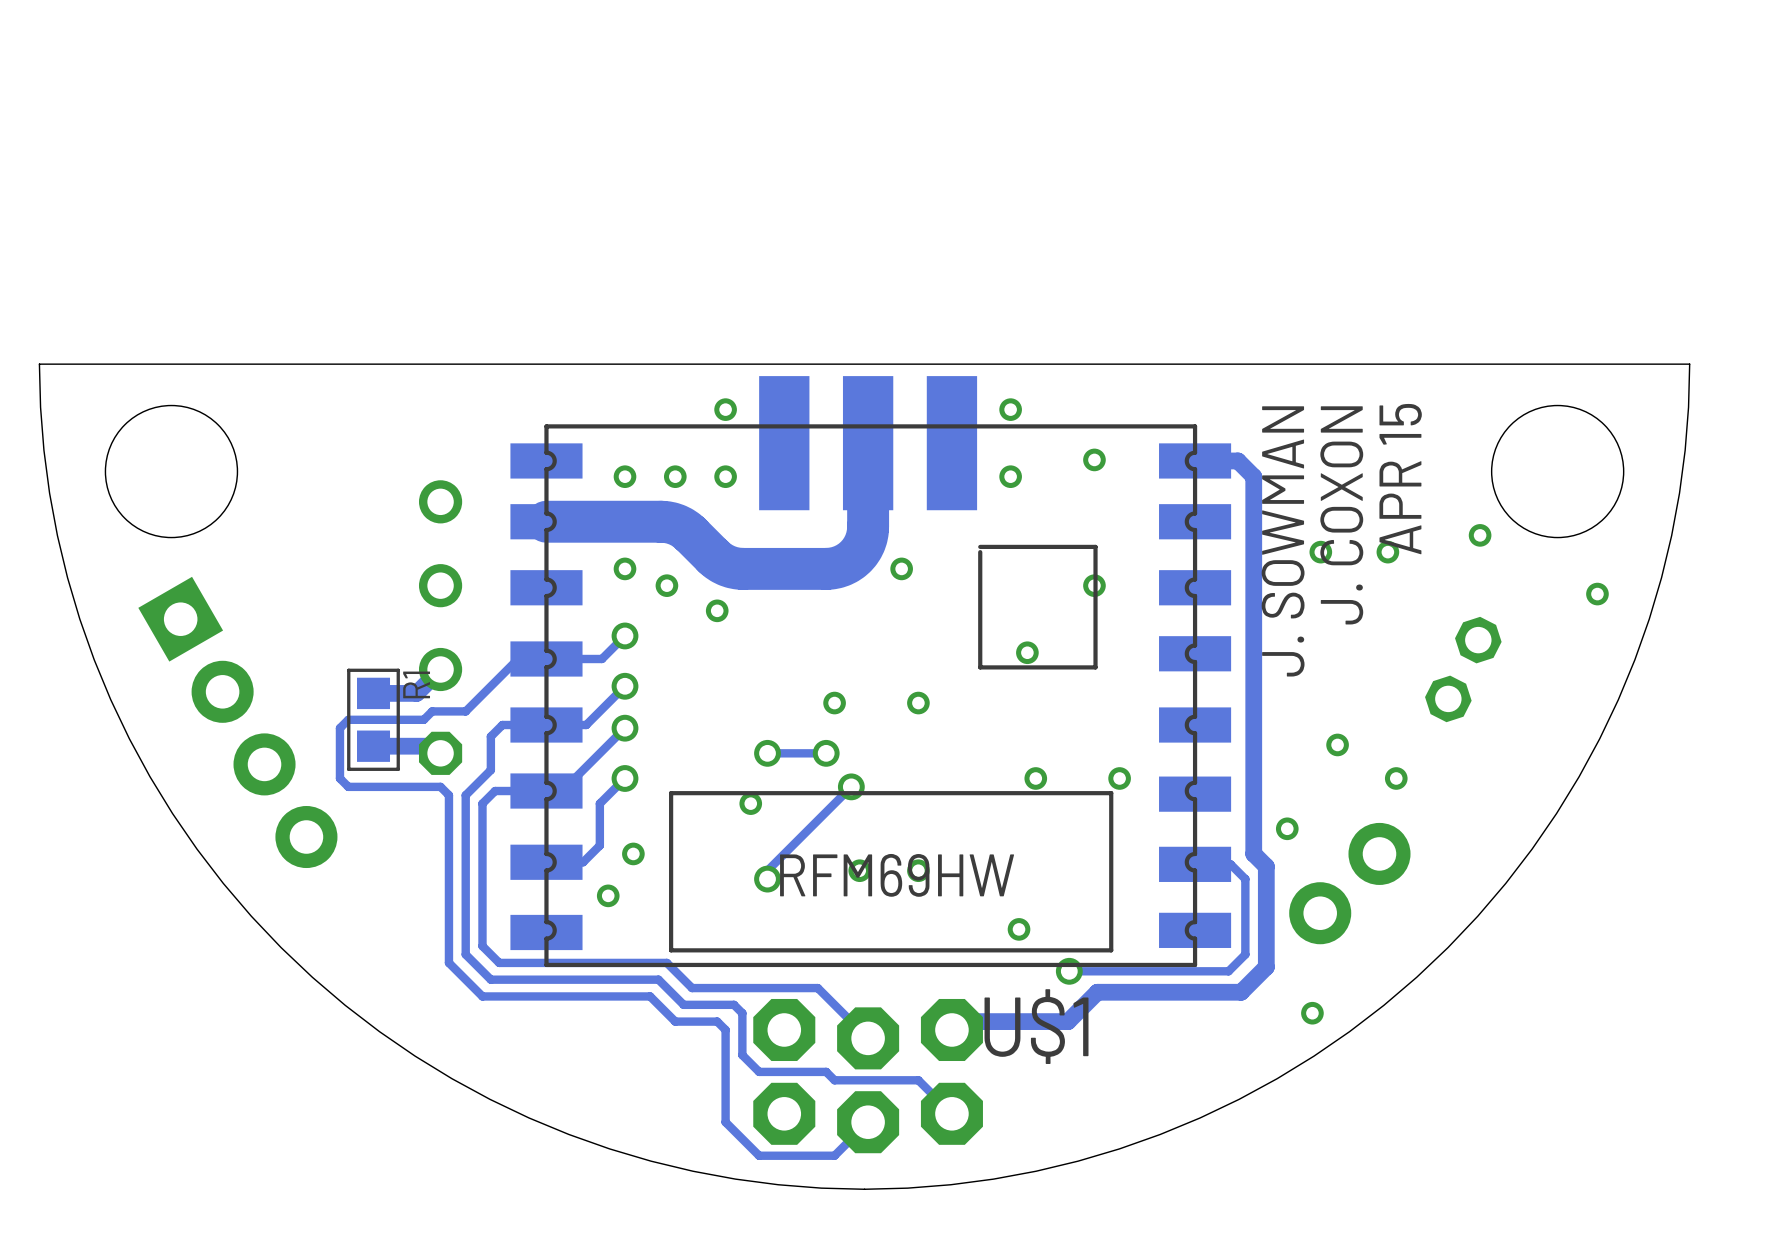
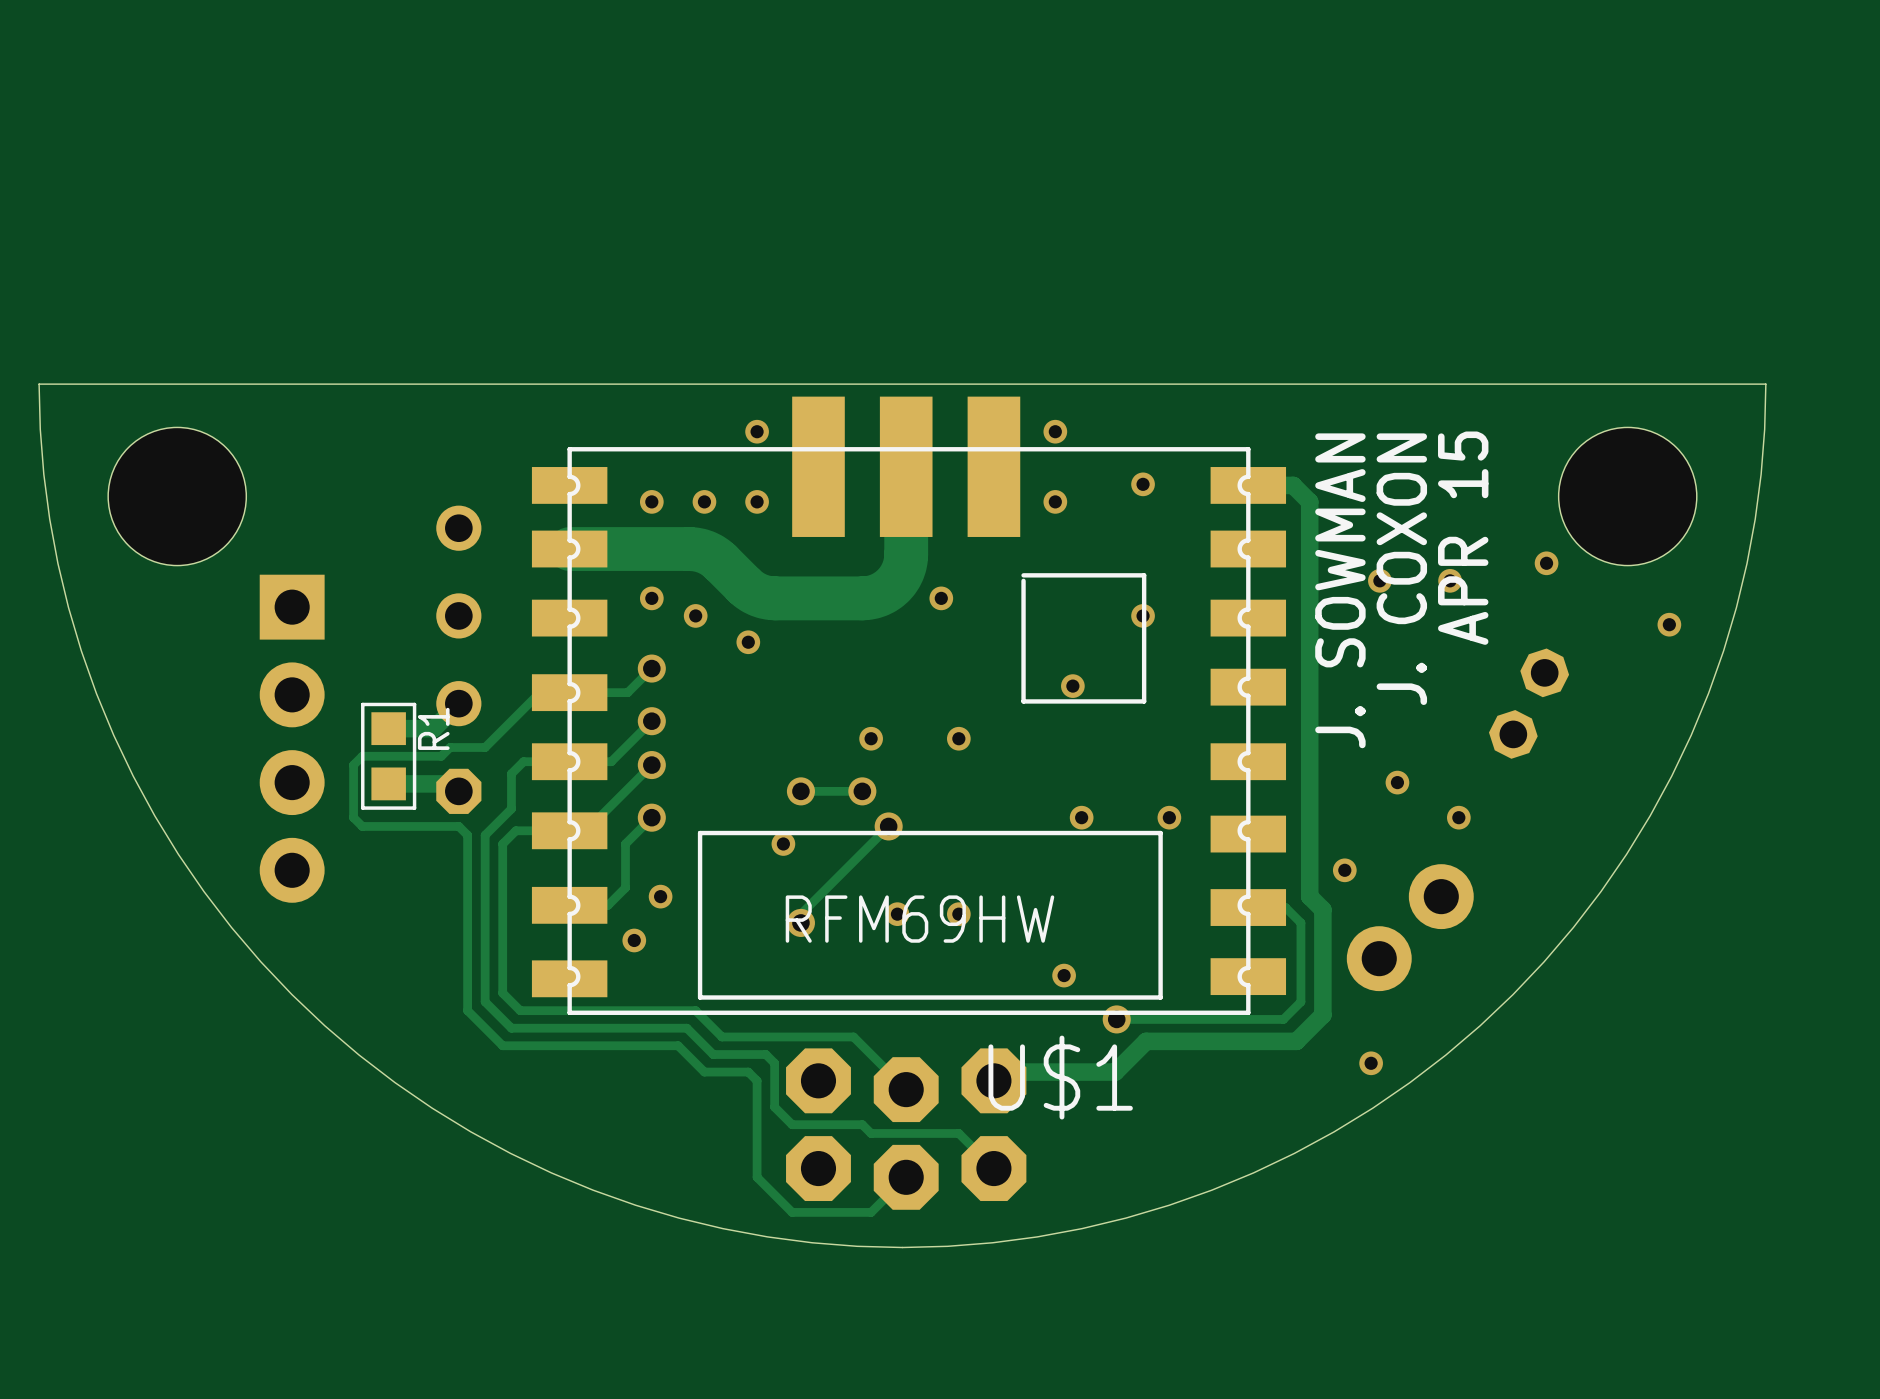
part: none -> (292, 738)
part: (237, 722) -> none

